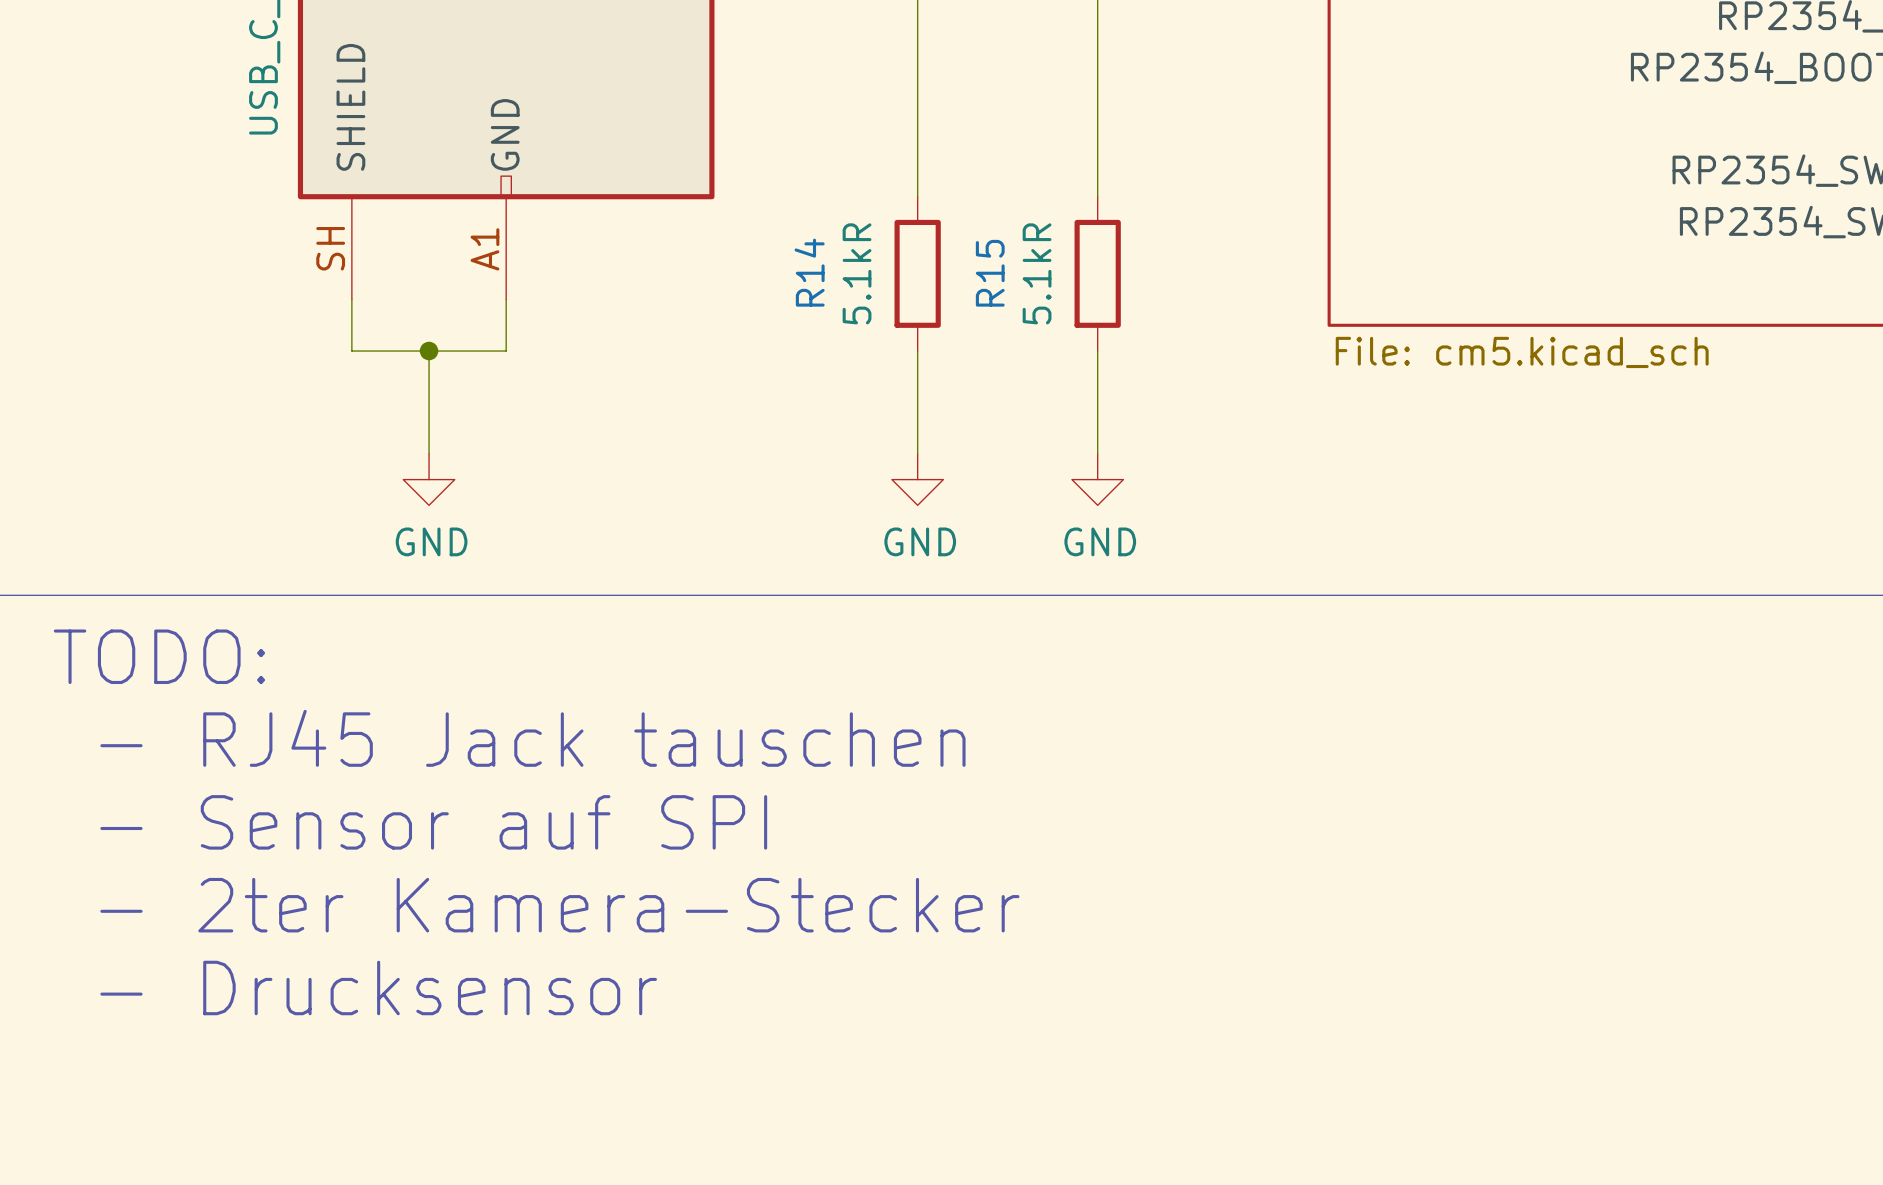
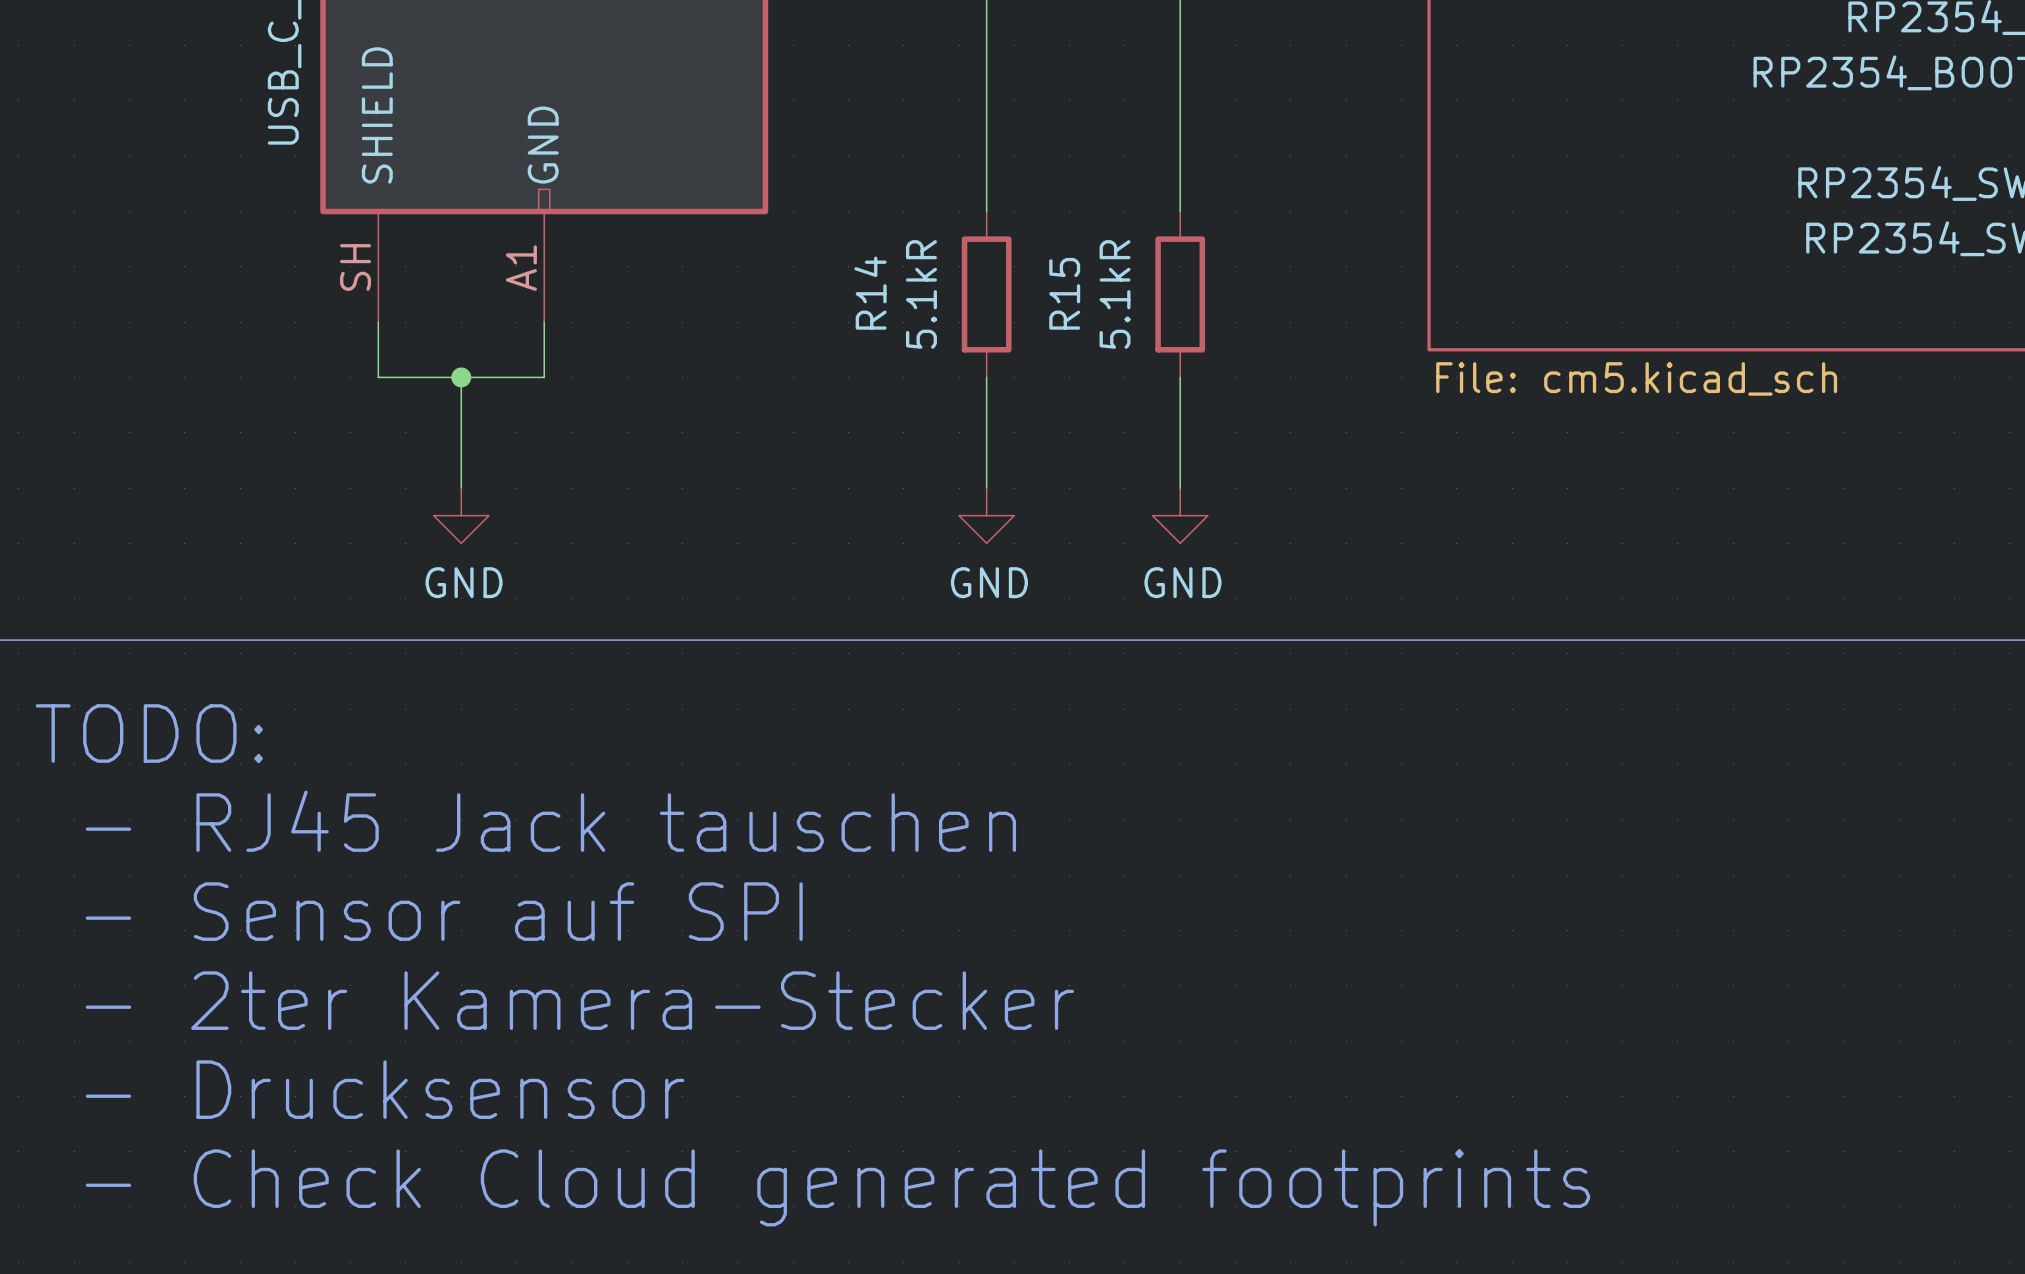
text position: TODO: (159, 656) -> TODO: (149, 733)
text position: - RJ45 Jack tauschen (532, 738) -> - RJ45 Jack tauschen (550, 821)
text position: - Sensor auf SPI (433, 822) -> - Sensor auf SPI (444, 911)
text position: - 2ter Kamera-Stecker (559, 905) -> - 2ter Kamera-Stecker (579, 1000)
text position: - Drucksensor (378, 987) -> - Drucksensor (384, 1089)
text: none -> - Check Cloud generated footprints (837, 1187)

